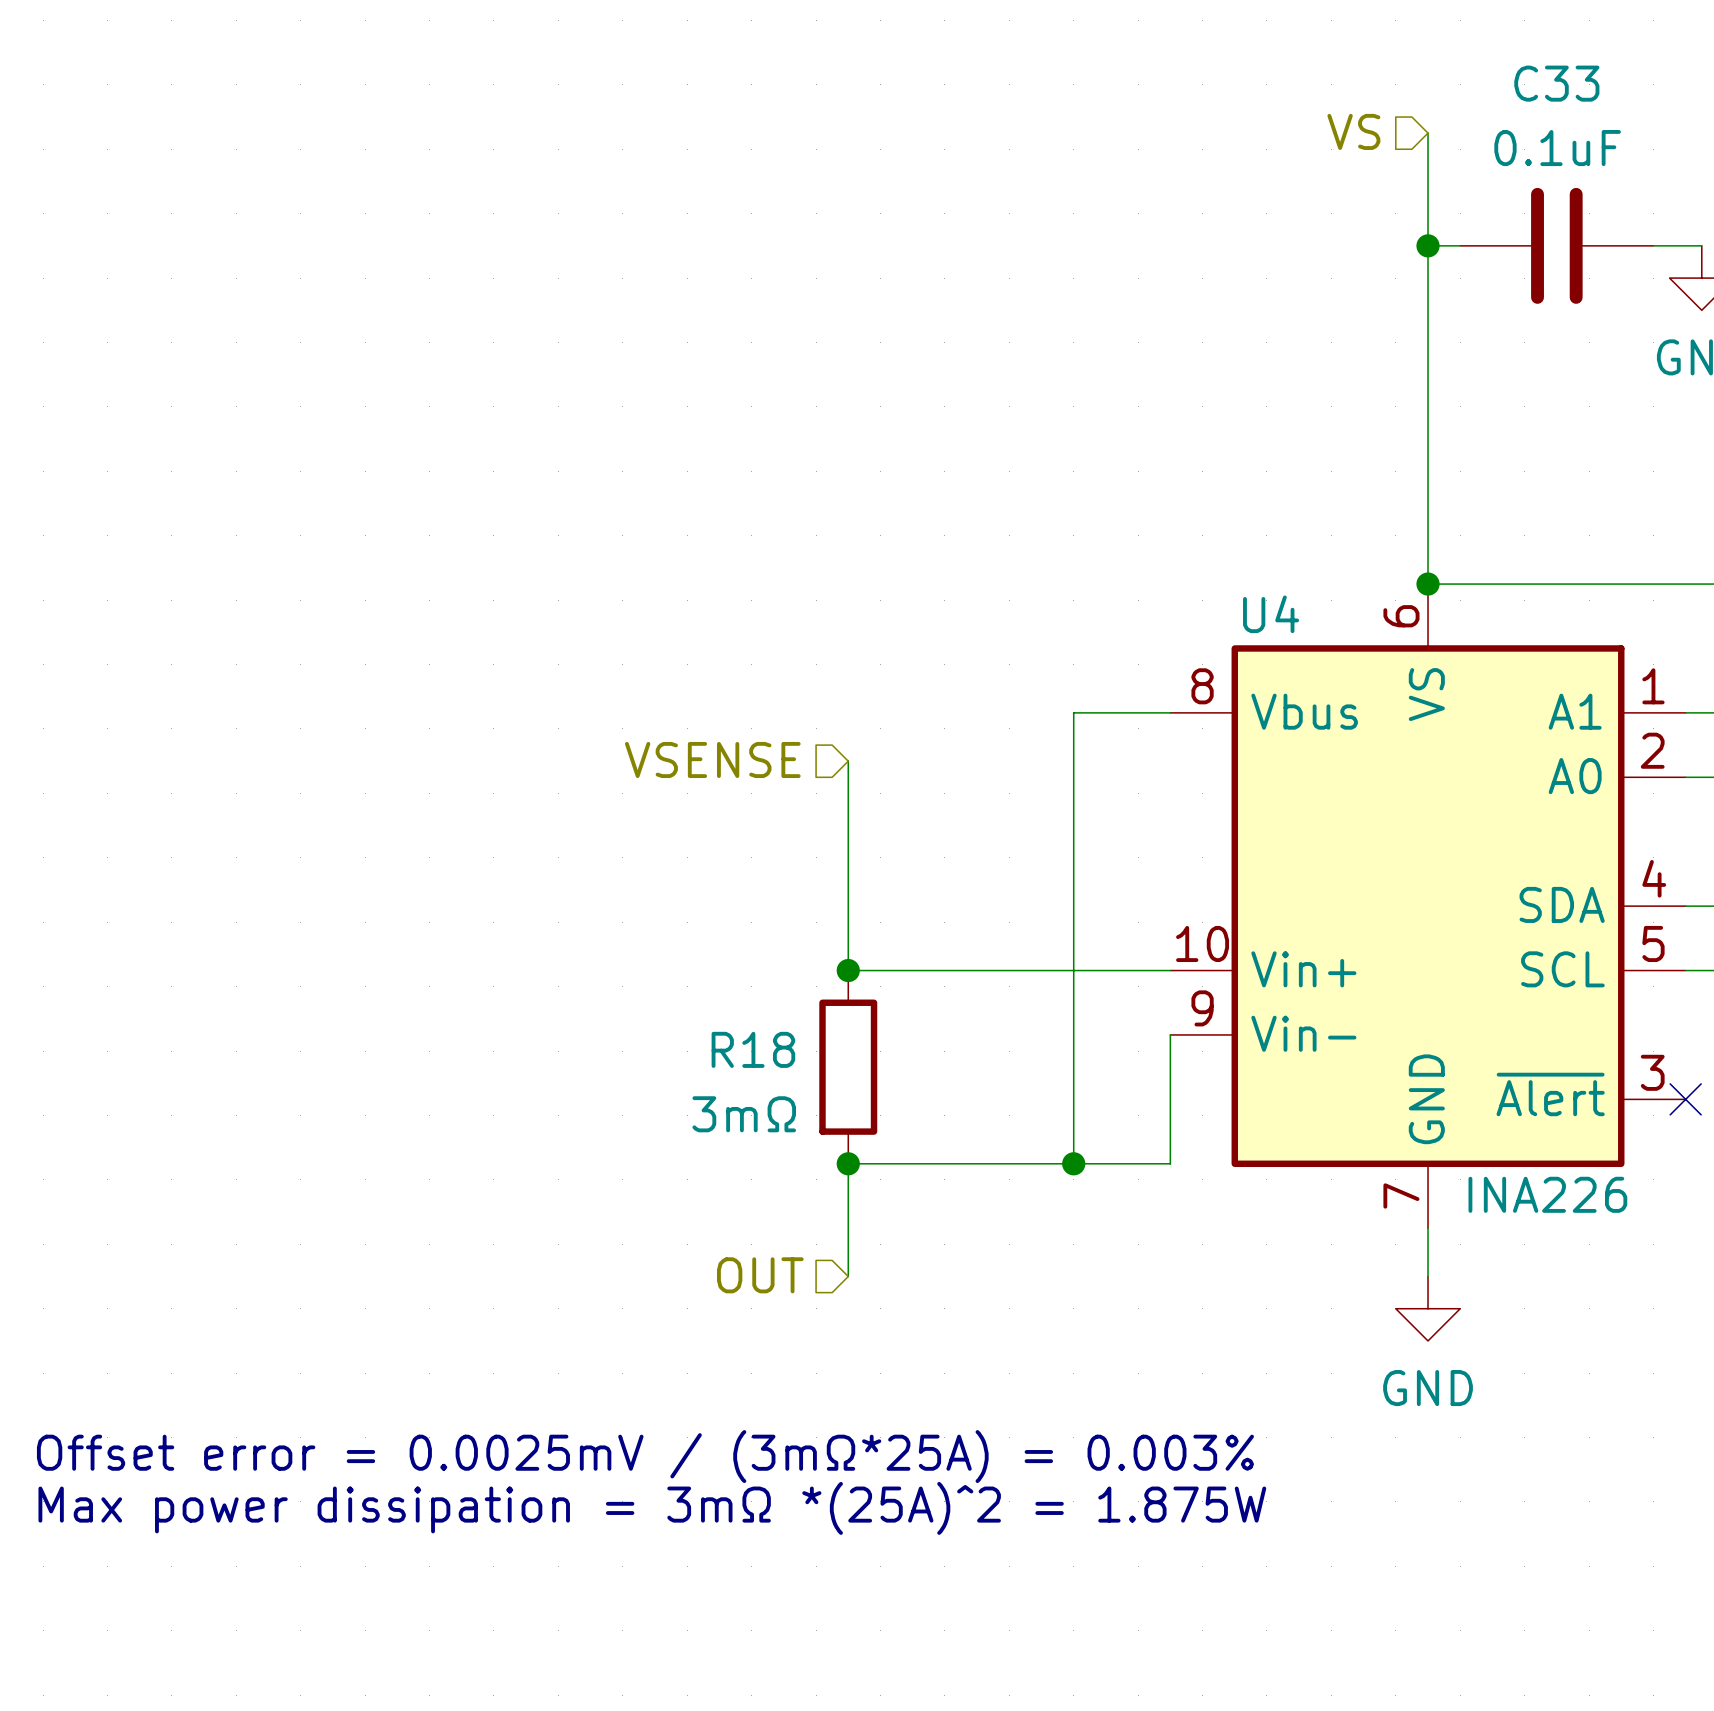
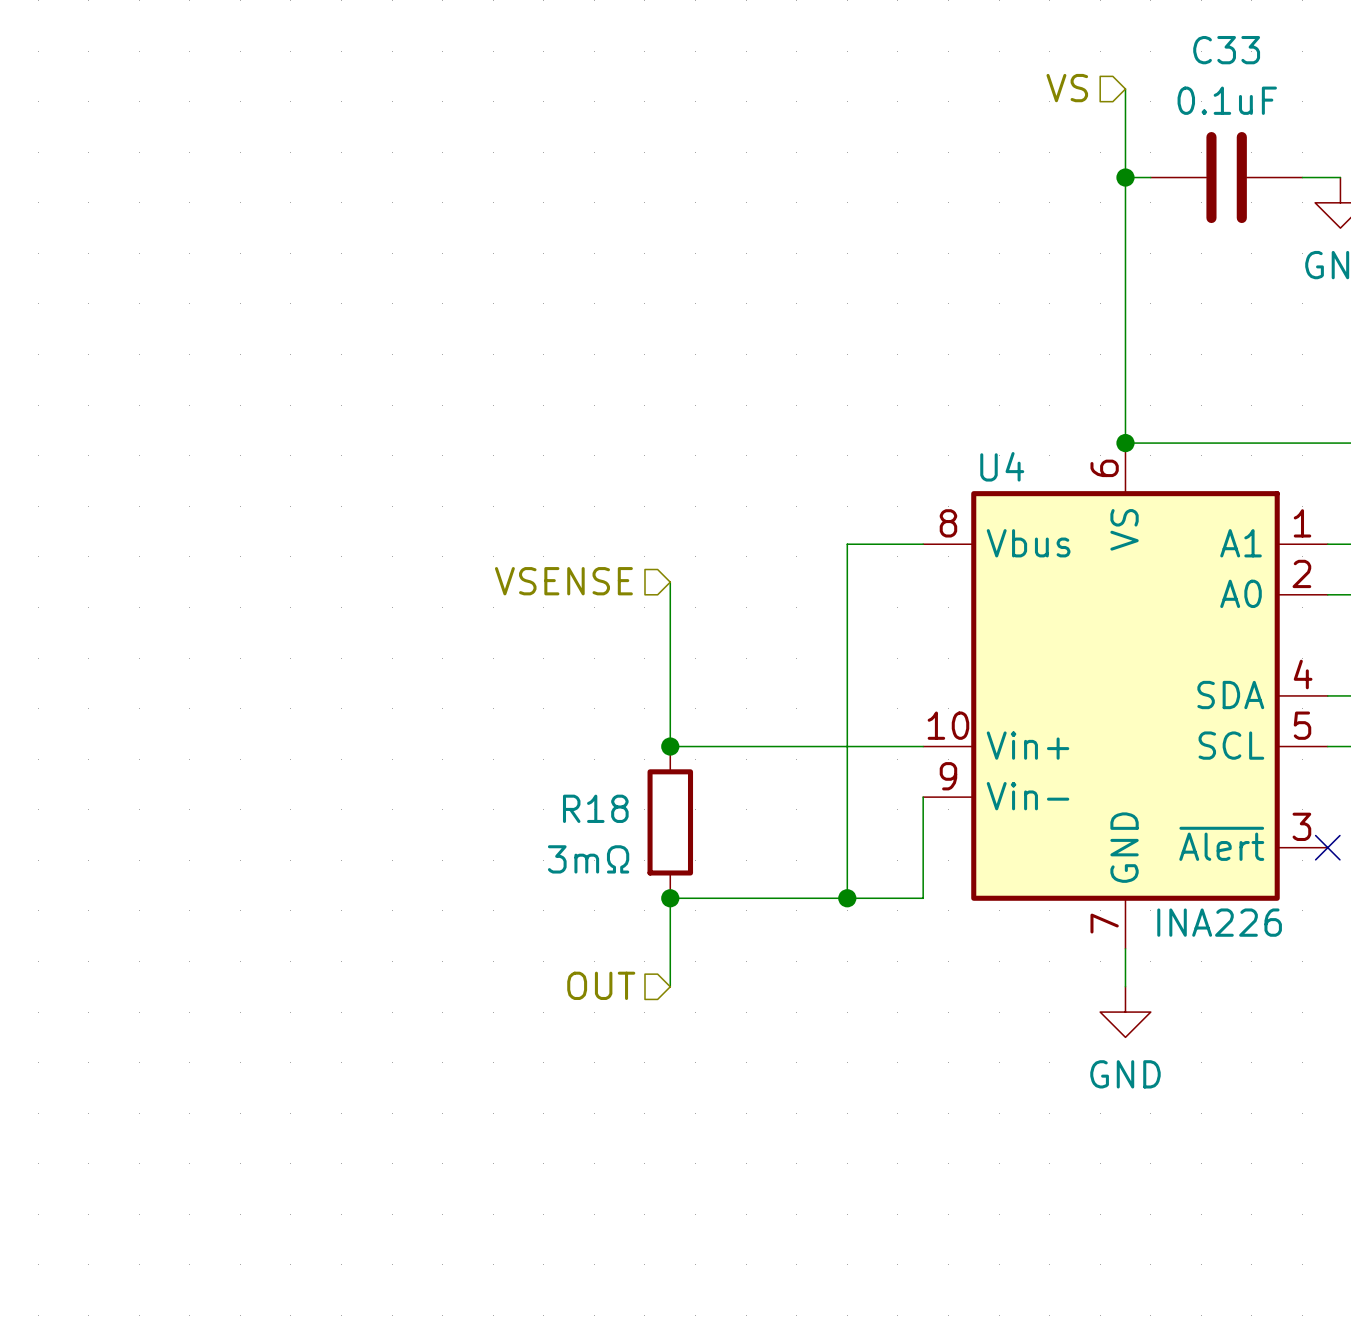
text: Offset error = 0.0025mV / (3mΩ*25A) = 0.003% (645, 1456) -> none
text: Max power dissipation = 3mΩ *(25A)^2 = 1.875W (652, 1508) -> none

